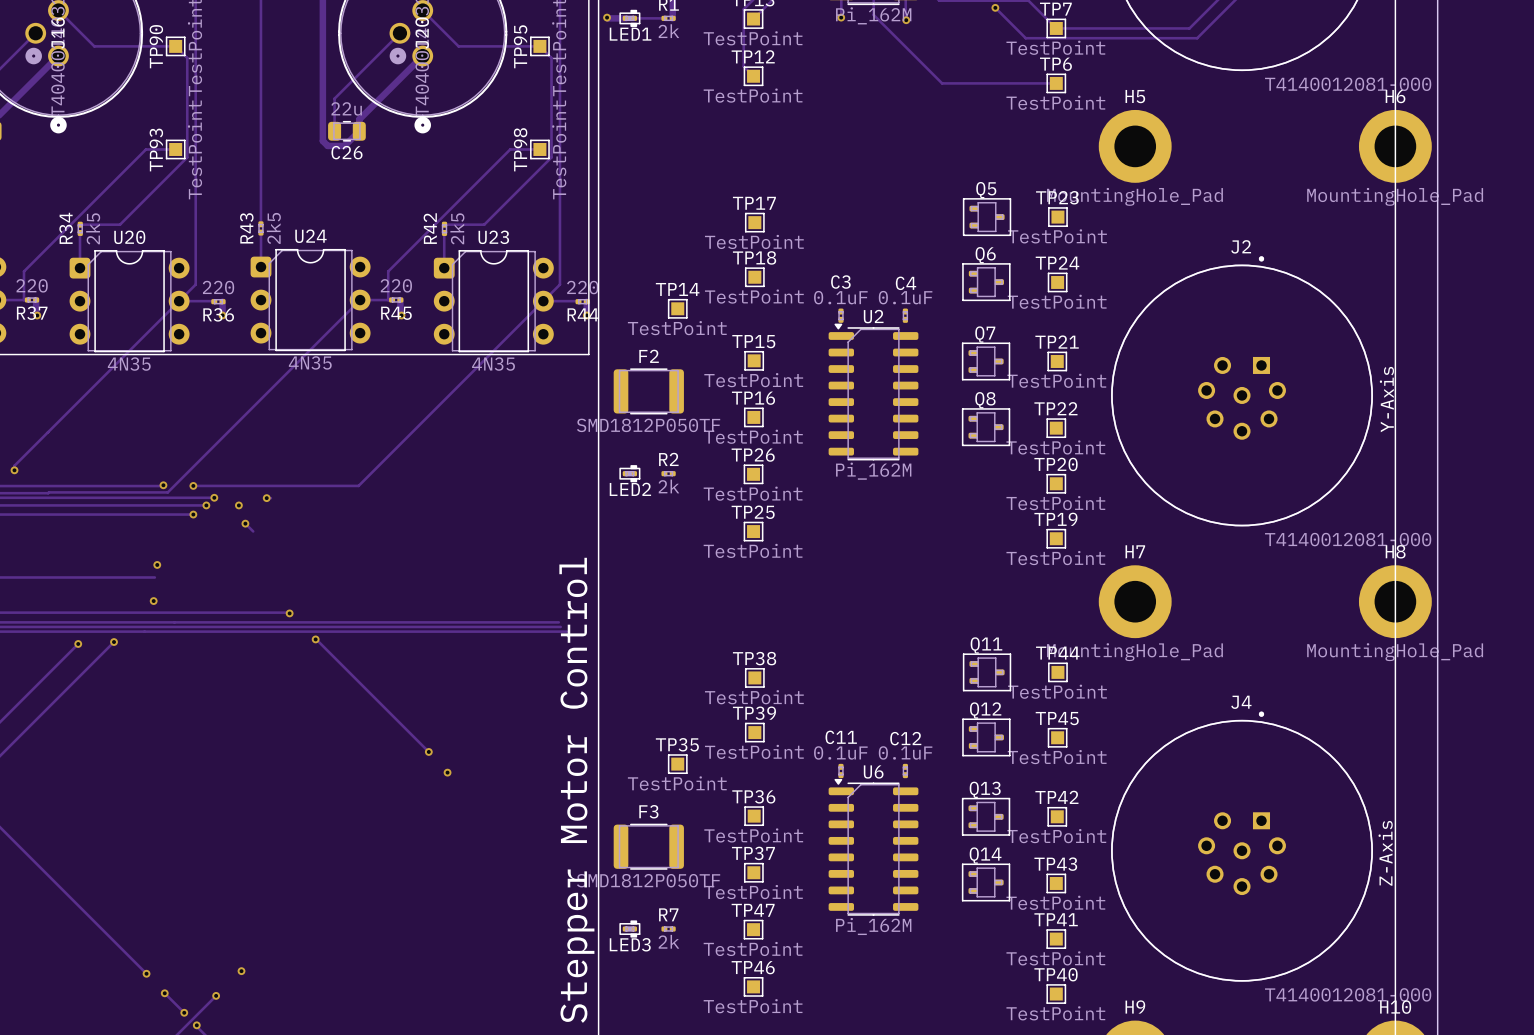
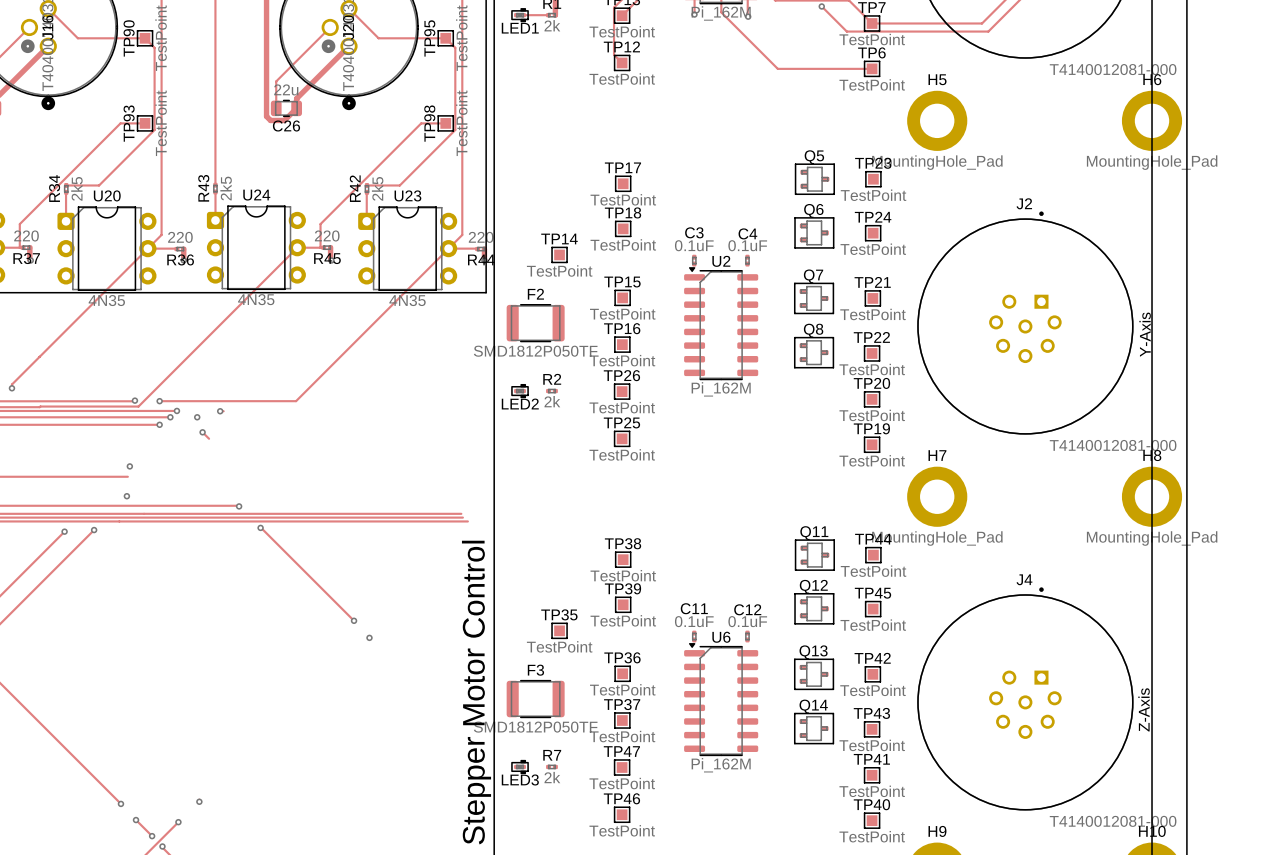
track: (607, 17) (625, 18) -> none
via: (607, 17) -> none

